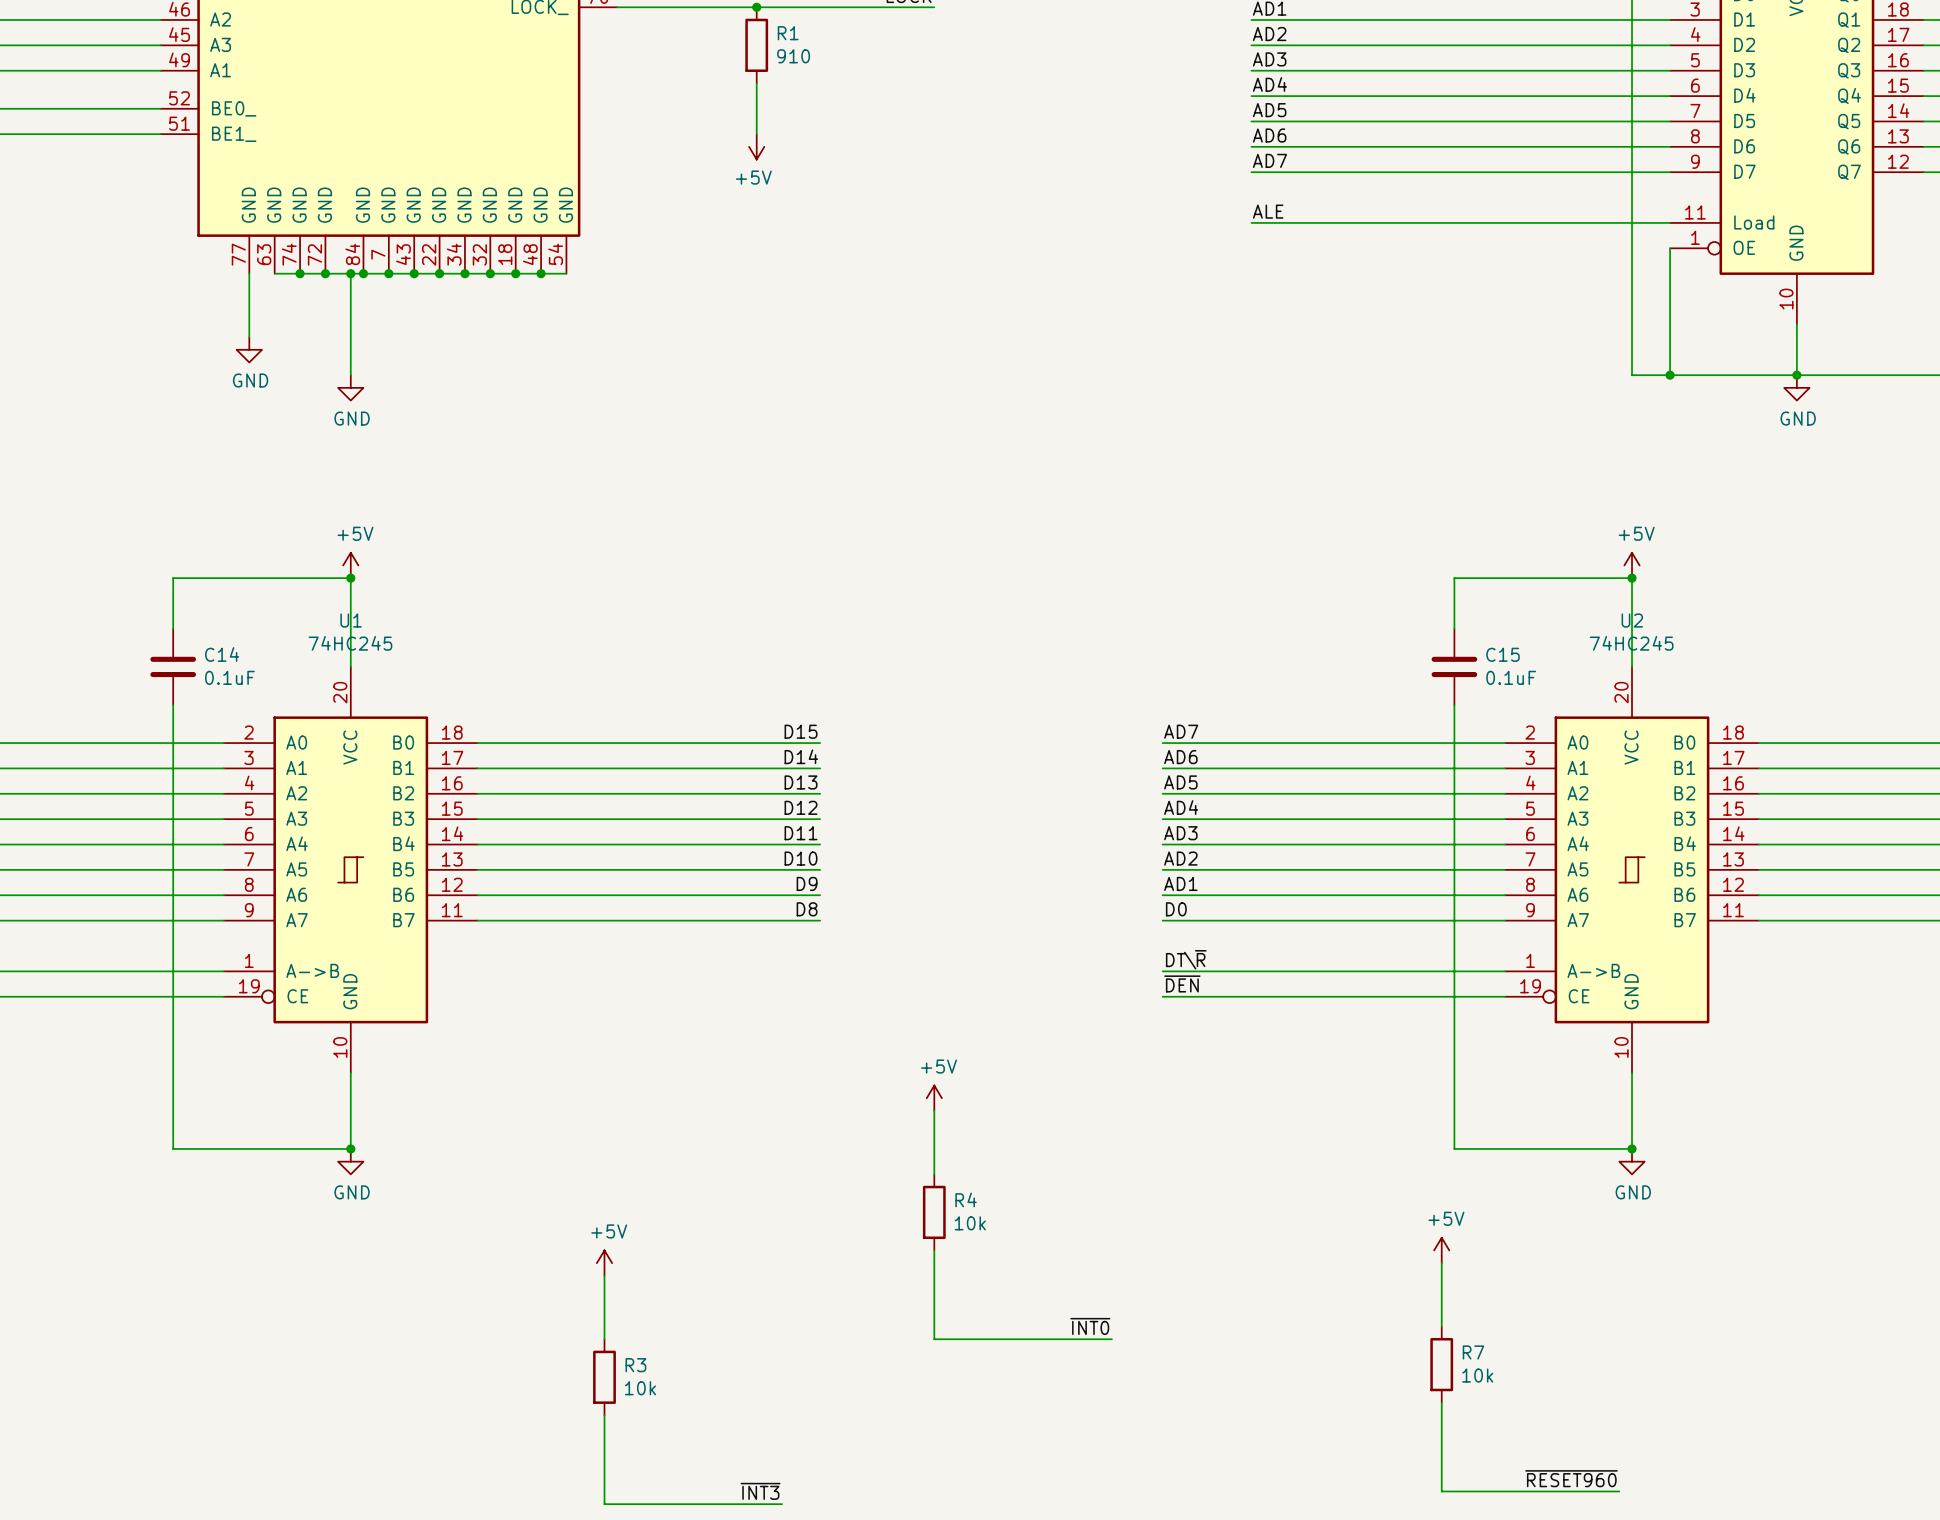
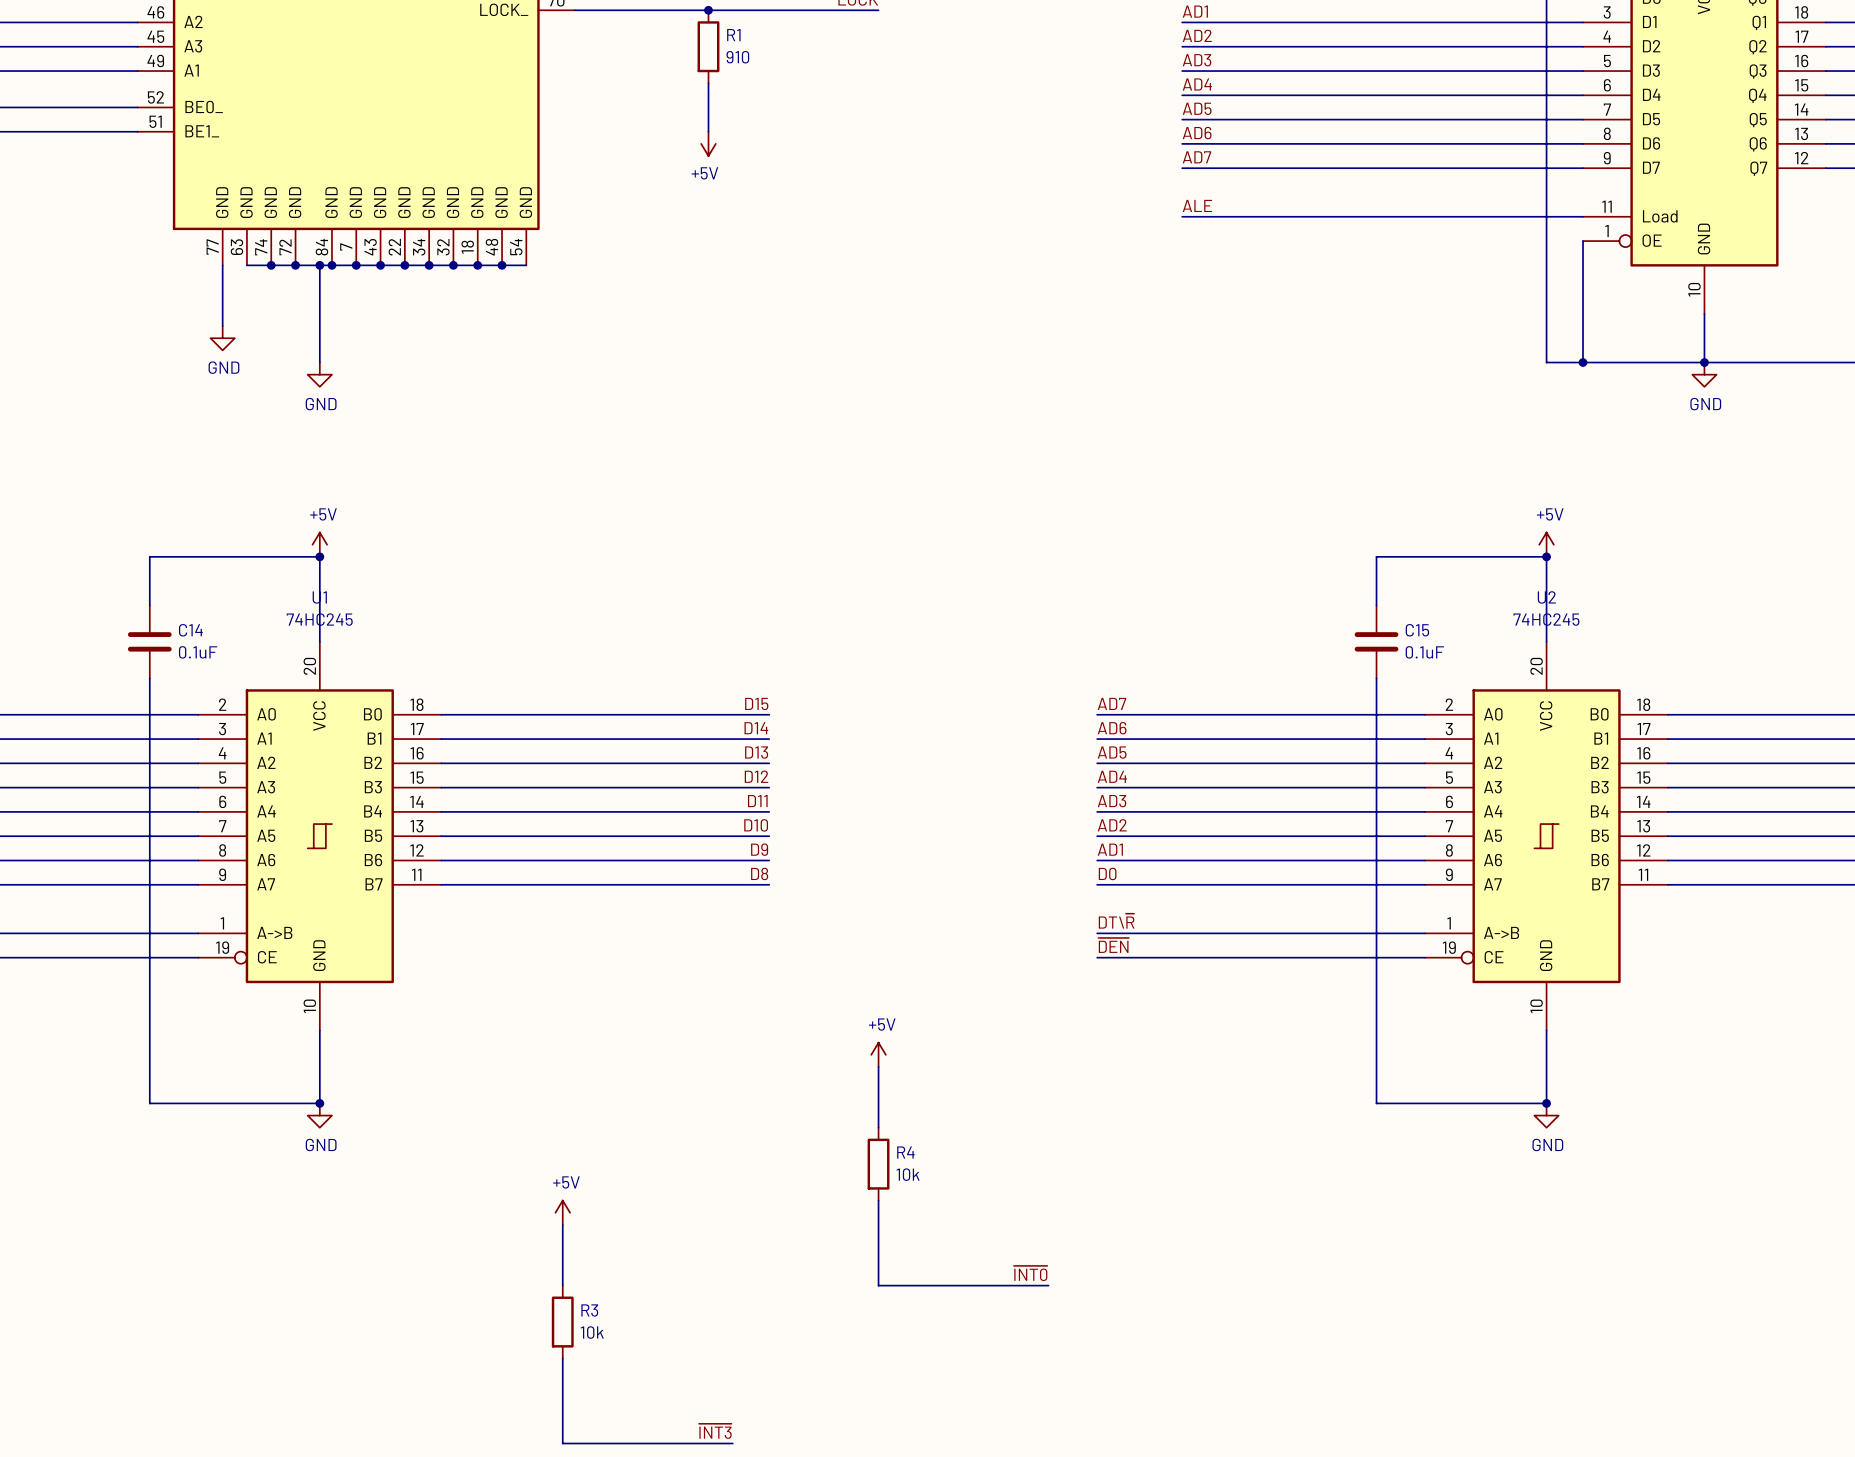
power symbol: +5V (1441, 1250) -> none
wire: (1441, 1263) (1441, 1326) -> none
R7: 10k (1441, 1364) -> none
wire: (1441, 1402) (1441, 1491) (1619, 1491) -> none
label: ~{RESET960} (1571, 1478) -> none

